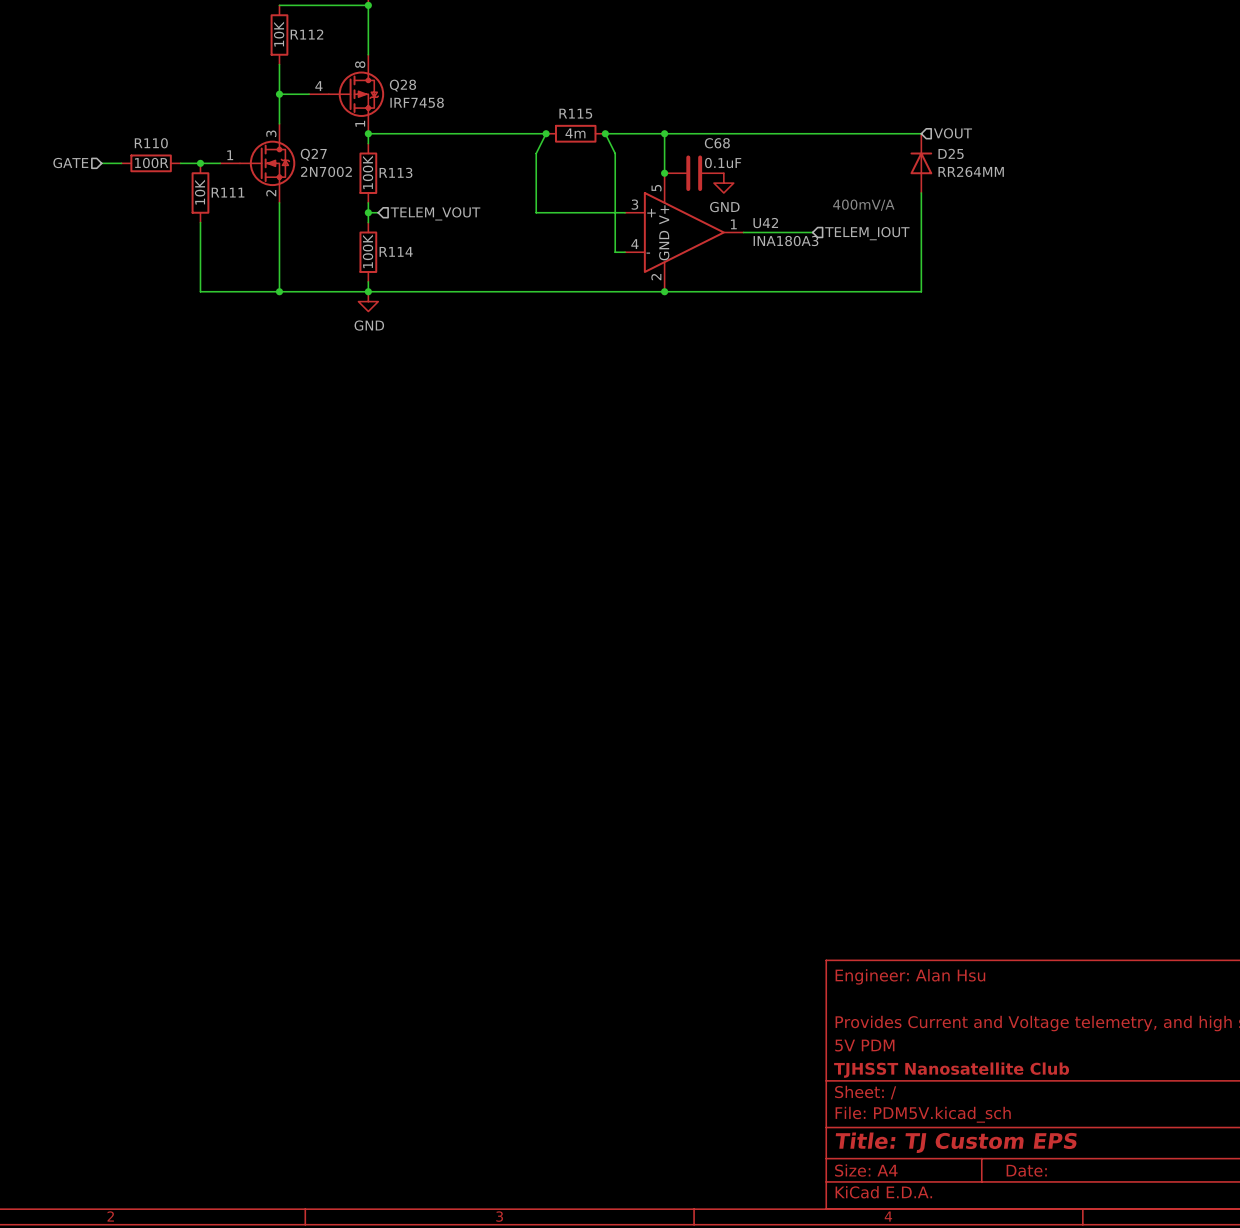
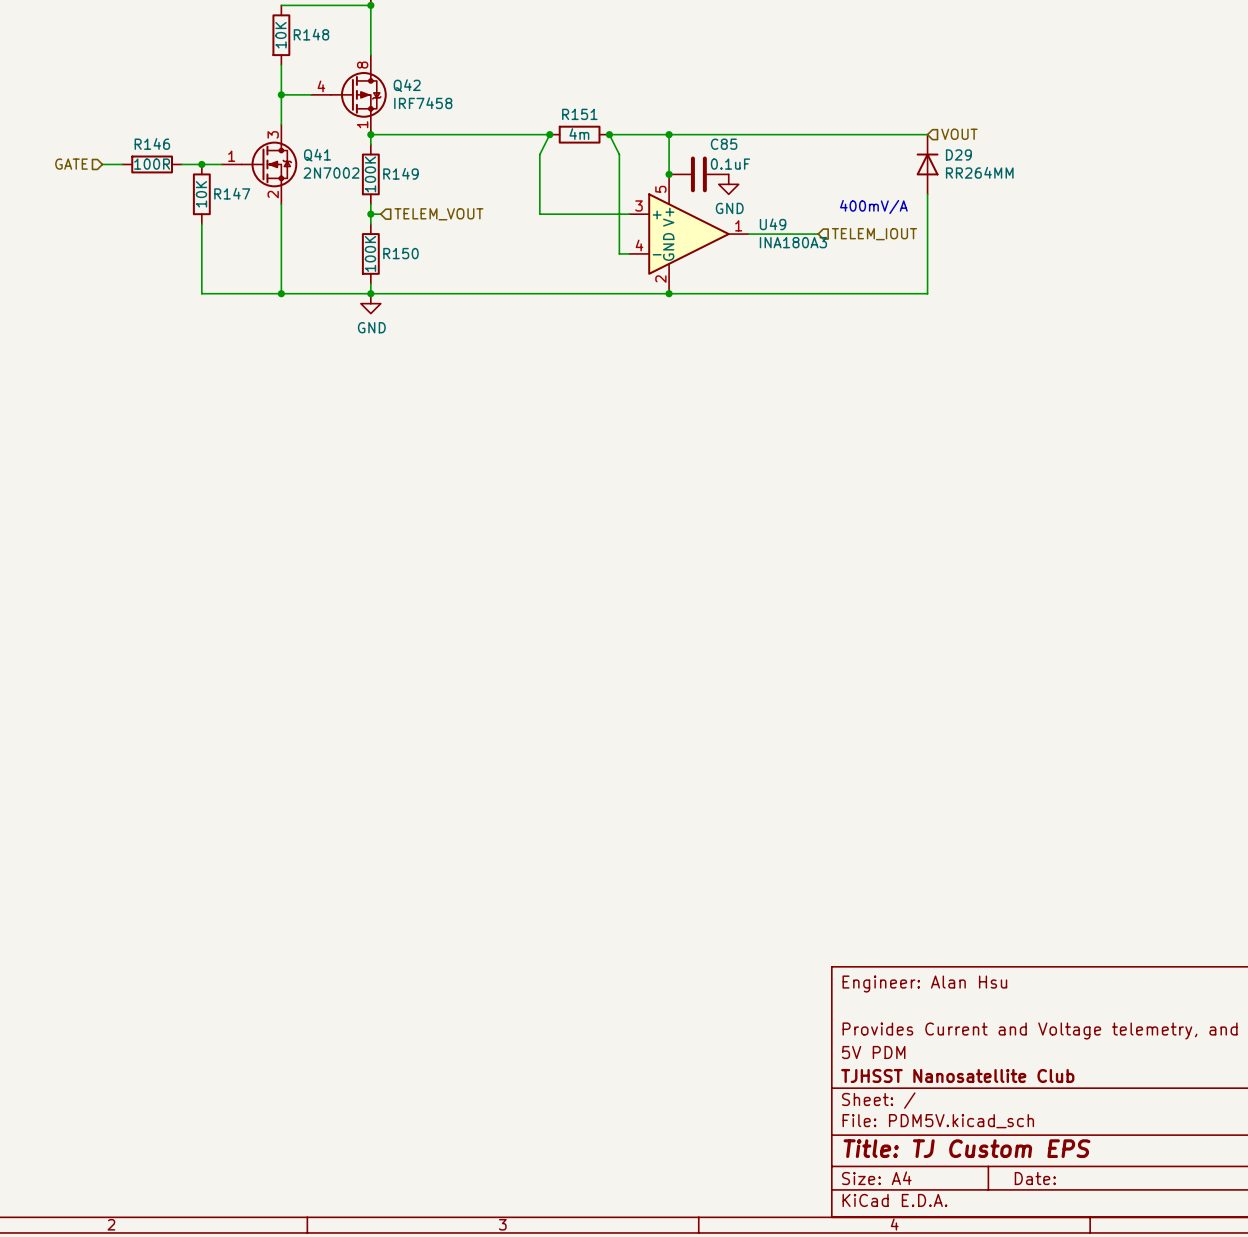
R112 name: R112 (306, 34) -> R148 (311, 34)
Q28 name: Q28 (402, 85) -> Q42 (407, 85)
R115 name: R115 (575, 113) -> R151 (579, 114)
R110 name: R110 (151, 143) -> R146 (152, 143)
C68 name: C68 (717, 143) -> C85 (724, 144)
D25 name: D25 (951, 153) -> D29 (958, 154)
Q27 name: Q27 (313, 154) -> Q41 (317, 155)
R113 name: R113 (395, 172) -> R149 (400, 173)
R111 name: R111 (228, 192) -> R147 (232, 193)
U42 name: U42 (765, 223) -> U49 (773, 224)
R114 name: R114 (396, 251) -> R150 (400, 253)

